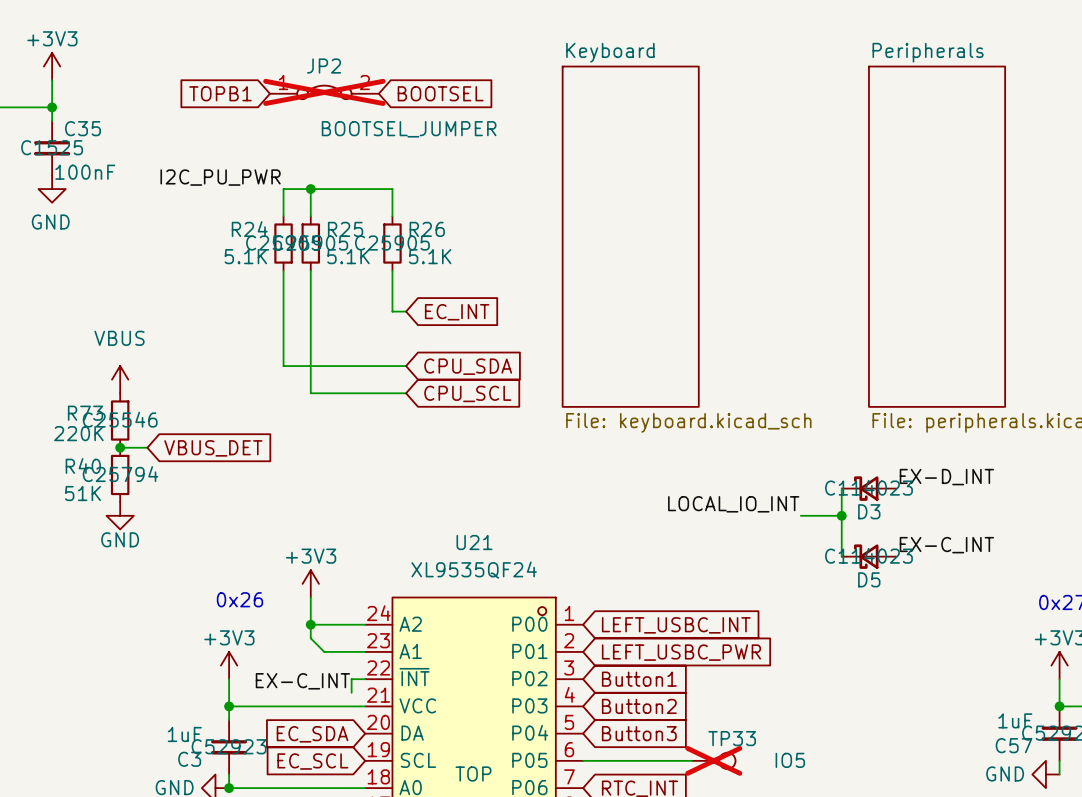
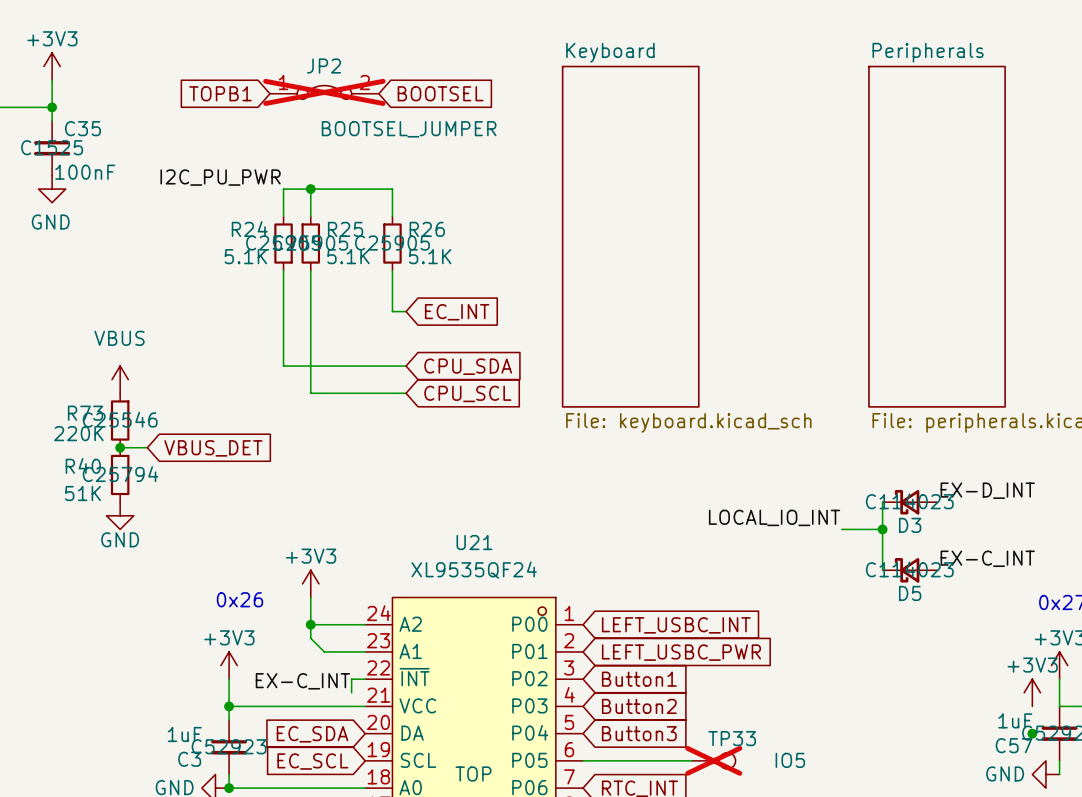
label position: EX-D_INT (946, 477) -> EX-D_INT (987, 490)
wire: (841, 488) (841, 556) -> (882, 502) (882, 570)
D3 position: (868, 488) -> (909, 502)
label position: LOCAL_IO_INT (733, 504) -> LOCAL_IO_INT (774, 517)
wire: (800, 515) (841, 515) -> (841, 529) (882, 529)
junction position: (841, 515) -> (882, 529)
label position: EX-C_INT (946, 545) -> EX-C_INT (987, 558)
D5 position: (868, 556) -> (909, 570)
power symbol: none -> +3V3 (1032, 692)
junction: (1059, 706) -> none
junction: none -> (1032, 733)

